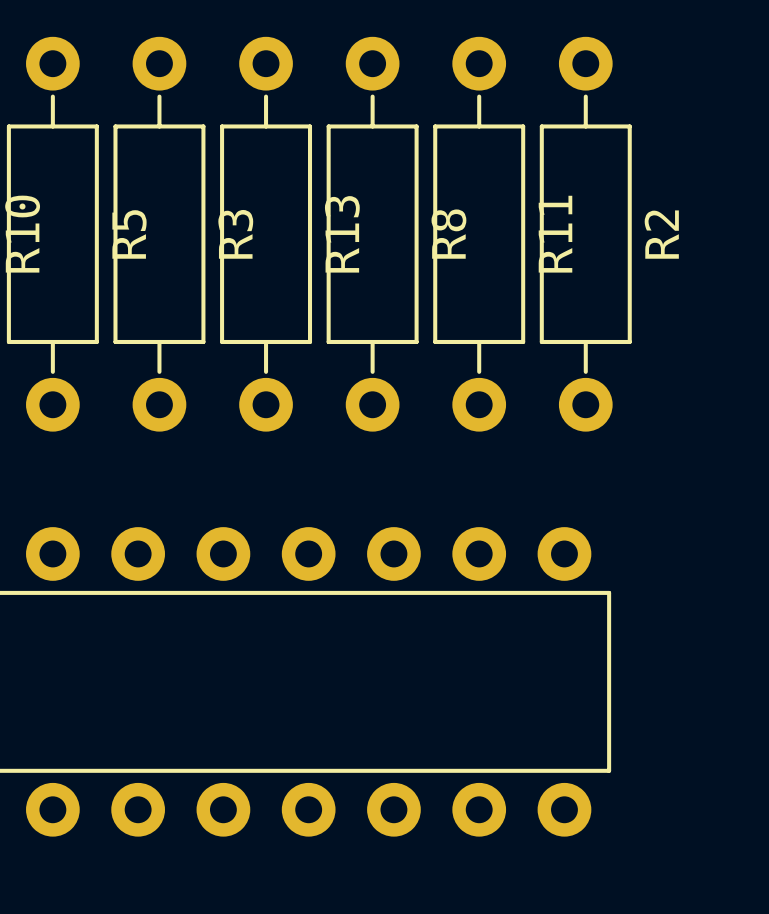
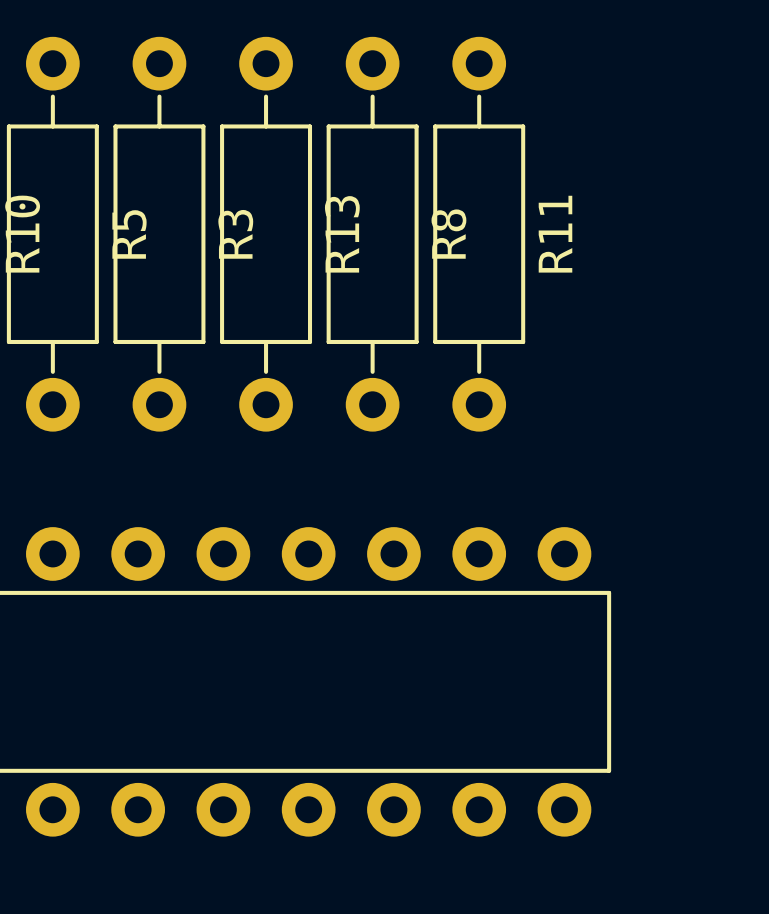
R2: (585, 234) -> none

